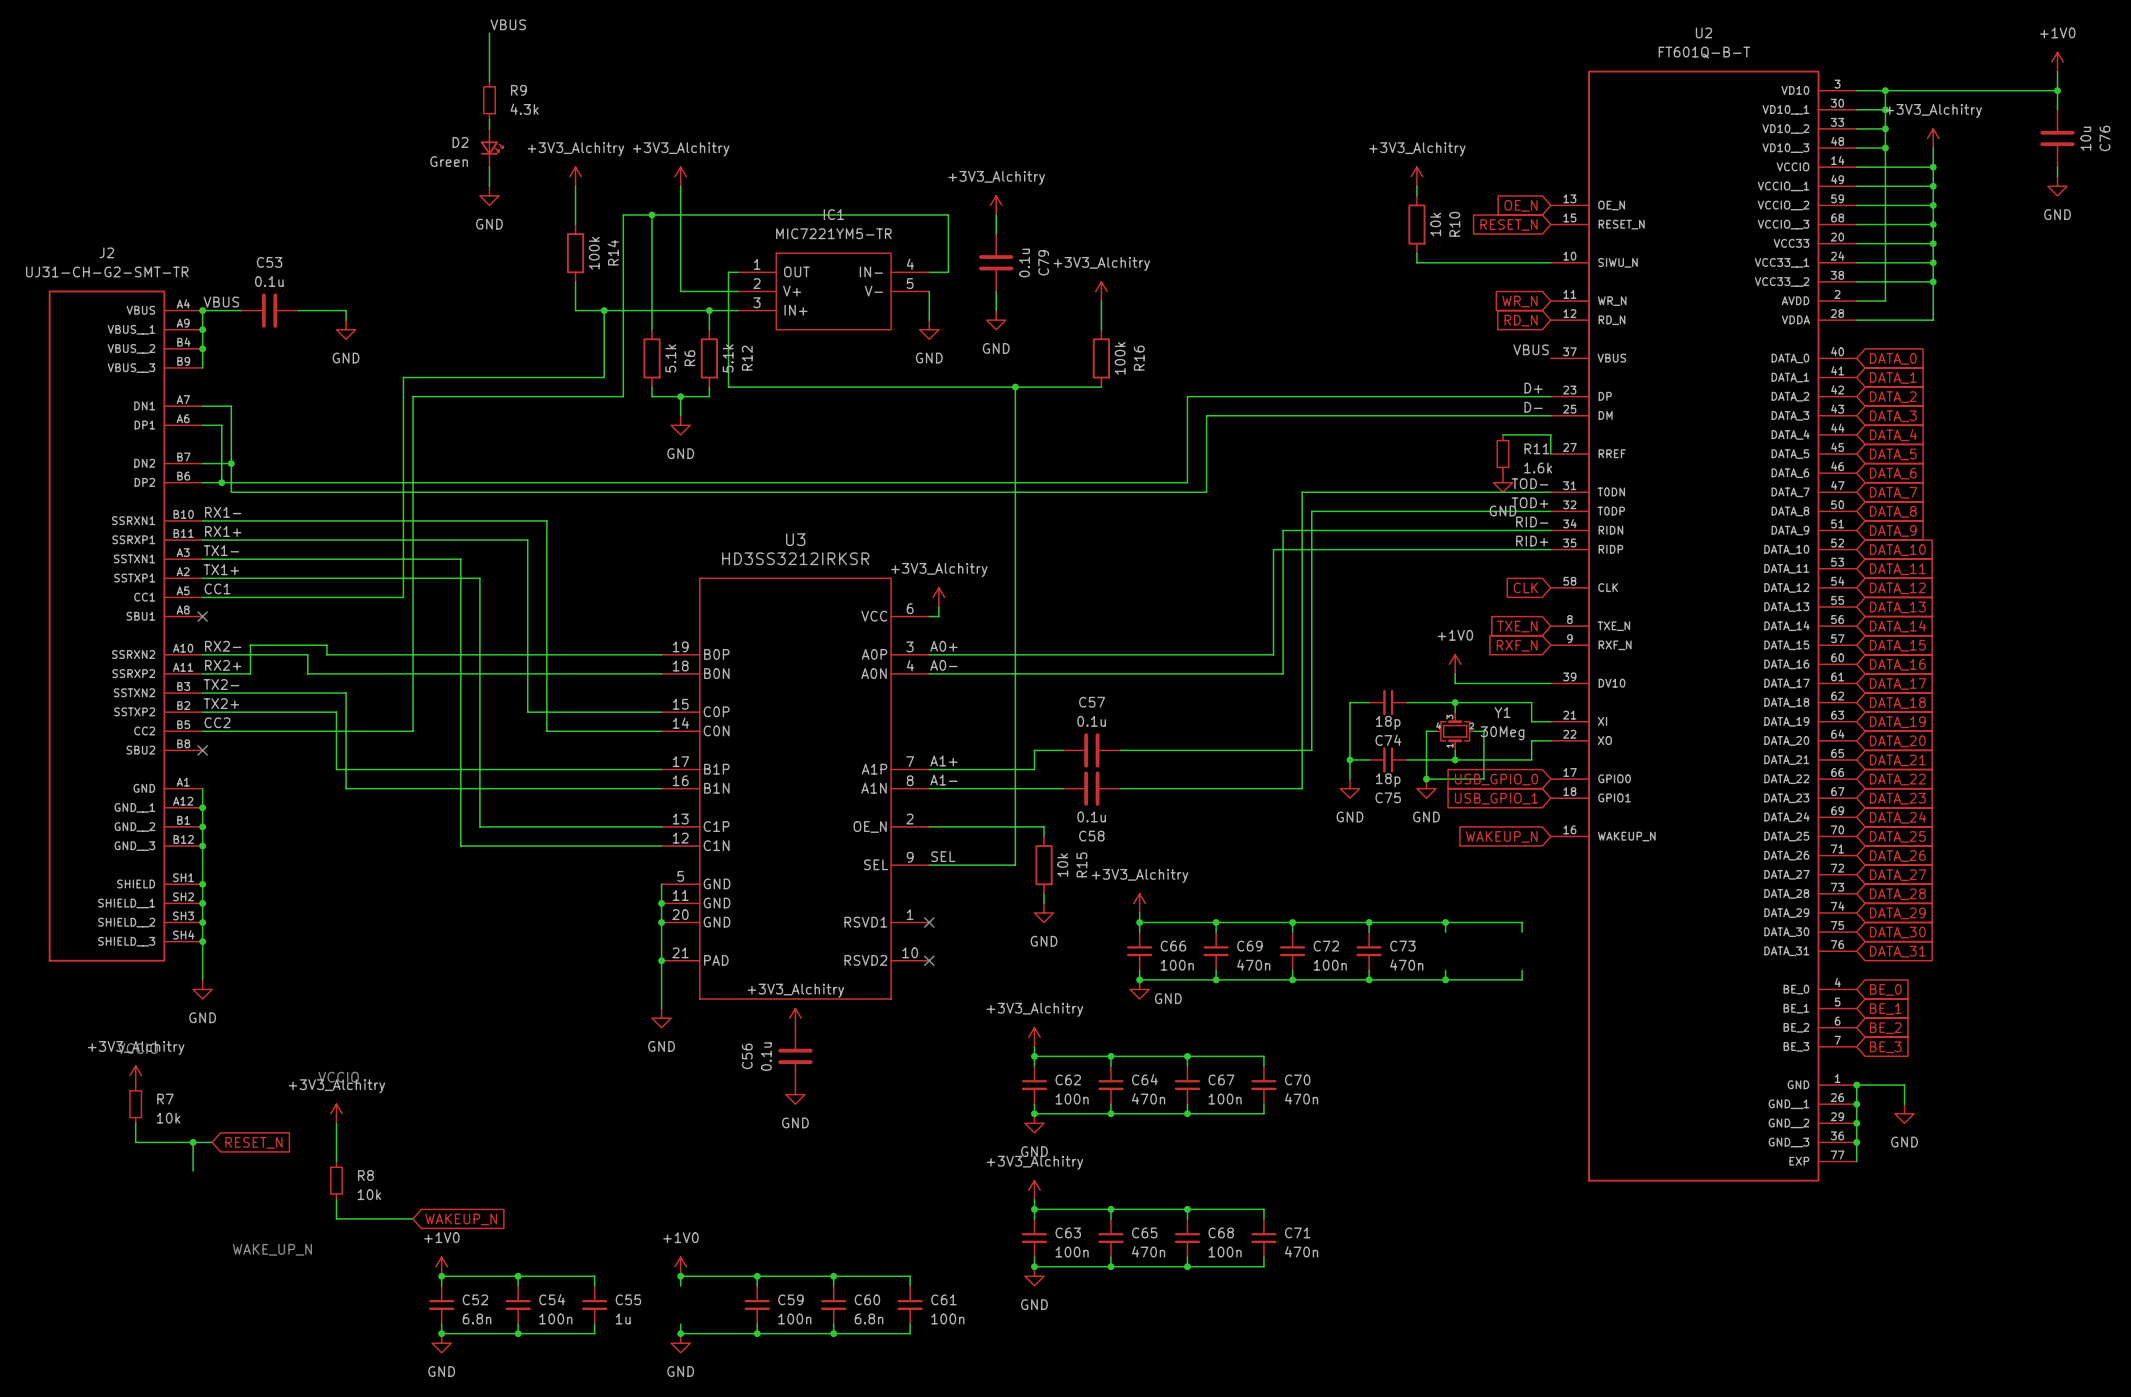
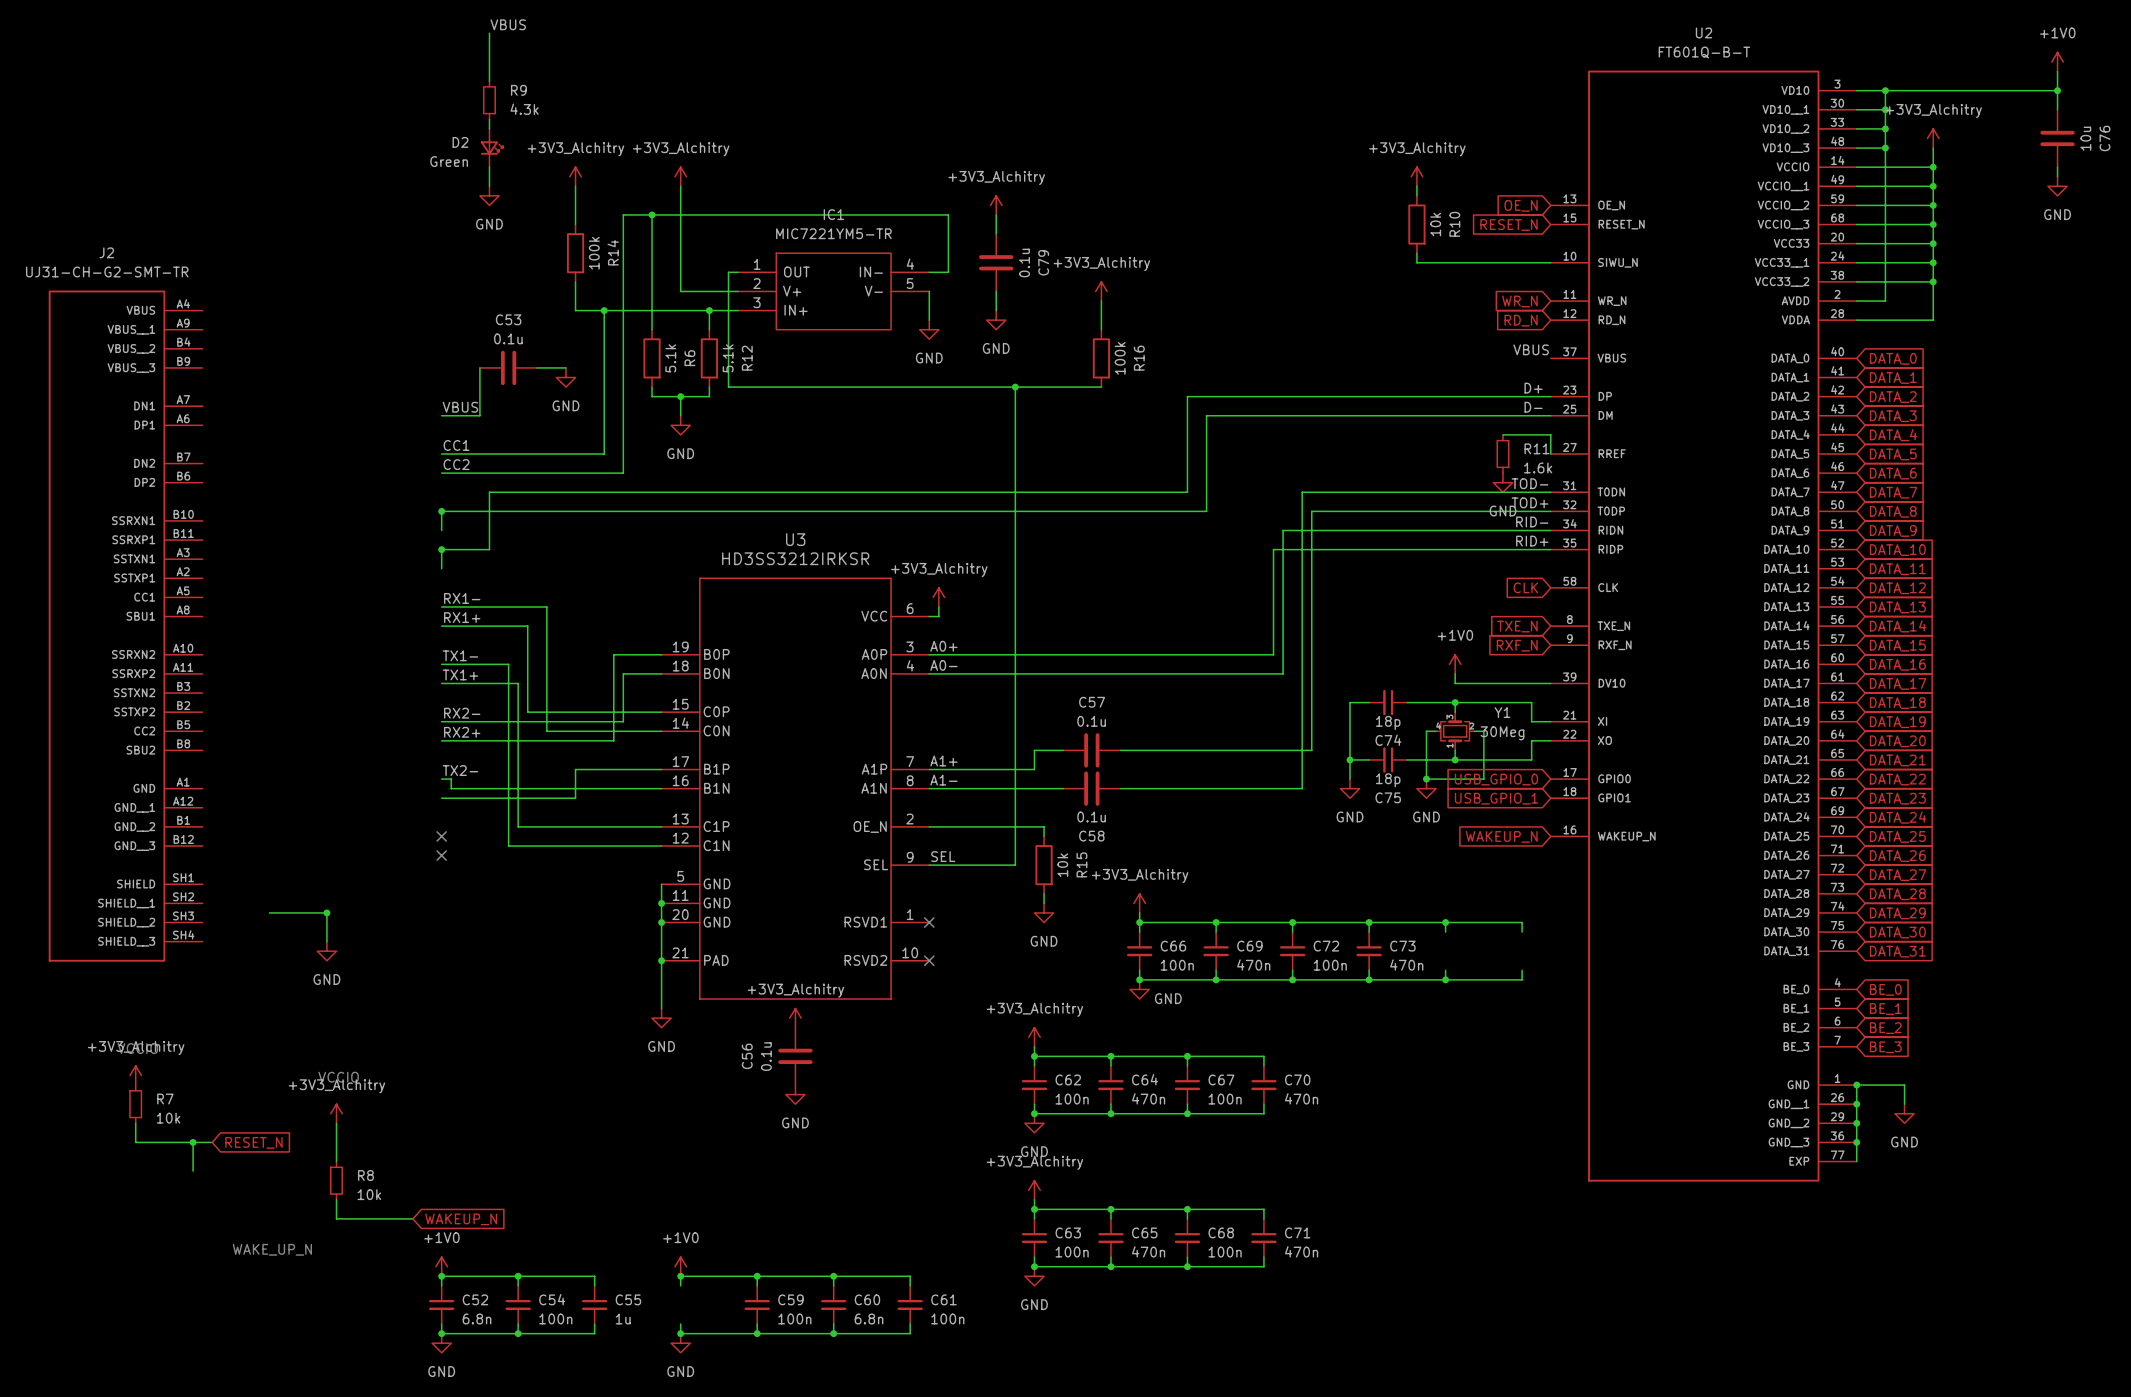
label: VBUS (221, 302) -> none
junction: (202, 310) -> none
wire: (240, 310) (202, 310) (202, 367) -> none
C53 position: (269, 310) -> (508, 367)
wire: (298, 310) (346, 310) (346, 320) -> none
junction: (202, 329) -> none
power symbol: GND (346, 329) -> none
junction: (202, 348) -> none
wire: none -> (479, 367) (479, 415) (441, 415)
wire: none -> (537, 367) (565, 367)
power symbol: none -> GND (565, 377)
wire: (604, 377) (403, 377) (403, 597) (202, 597) -> (604, 377) (604, 454) (441, 454)
wire: (623, 396) (412, 396) (412, 731) (202, 731) -> (623, 396) (623, 473) (441, 473)
wire: (202, 406) (231, 406) (231, 492) (489, 492) -> (441, 568) (441, 549) (489, 549) (489, 492)
label: none -> VBUS (460, 407)
wire: (202, 425) (221, 425) (221, 482) -> none
label: none -> CC1 (456, 445)
wire: (202, 463) (231, 463) -> none
junction: (231, 463) -> none
label: none -> CC2 (456, 464)
wire: (202, 482) (1187, 482) -> none
junction: (221, 482) -> none
wire: (1187, 492) (1206, 492) -> (1187, 492) (1187, 482)
wire: none -> (1206, 492) (1206, 511) (441, 511) (441, 530)
junction: none -> (441, 511)
label: RX1- (223, 512) -> none
wire: (202, 520) (546, 520) (546, 606) -> (441, 606) (546, 606)
label: RX1+ (223, 531) -> none
wire: (202, 540) (527, 540) (527, 626) -> (441, 626) (527, 626)
junction: none -> (441, 549)
label: TX1- (221, 550) -> none
wire: (202, 559) (460, 559) (460, 846) (508, 846) -> (441, 664) (508, 664) (508, 846)
label: TX1+ (221, 569) -> none
wire: (202, 578) (479, 578) (479, 826) (518, 826) -> (441, 683) (518, 683) (518, 826)
label: CC1 (217, 588) -> none
label: none -> RX1- (462, 598)
no-connect mark: (202, 616) -> none
label: none -> RX1+ (462, 617)
label: RX2- (223, 646) -> none
wire: (202, 654) (307, 654) (307, 673) (623, 673) -> (441, 721) (623, 721) (623, 673)
wire: (613, 654) (326, 654) (326, 645) (250, 645) (250, 673) (202, 673) -> (613, 654) (613, 740) (441, 740)
label: none -> TX1- (460, 655)
label: RX2+ (223, 665) -> none
label: none -> TX1+ (460, 674)
label: TX2- (221, 684) -> none
wire: (202, 693) (346, 693) (346, 788) (451, 788) -> (441, 779) (451, 779) (451, 788)
label: TX2+ (221, 703) -> none
wire: (202, 712) (336, 712) (336, 769) (575, 769) -> (441, 798) (575, 798) (575, 769)
label: none -> RX2- (462, 713)
label: CC2 (217, 722) -> none
label: none -> RX2+ (462, 732)
no-connect mark: (202, 750) -> none
label: none -> TX2- (460, 770)
wire: (202, 788) (202, 979) -> none
junction: (202, 807) -> none
junction: (202, 826) -> none
no-connect mark: none -> (441, 836)
junction: (202, 846) -> none
no-connect mark: none -> (441, 855)
junction: (202, 884) -> none
junction: (202, 903) -> none
wire: none -> (269, 912) (326, 912) (326, 941)
junction: none -> (326, 912)
junction: (202, 922) -> none
junction: (202, 941) -> none
power symbol position: GND (202, 989) -> GND (326, 951)

